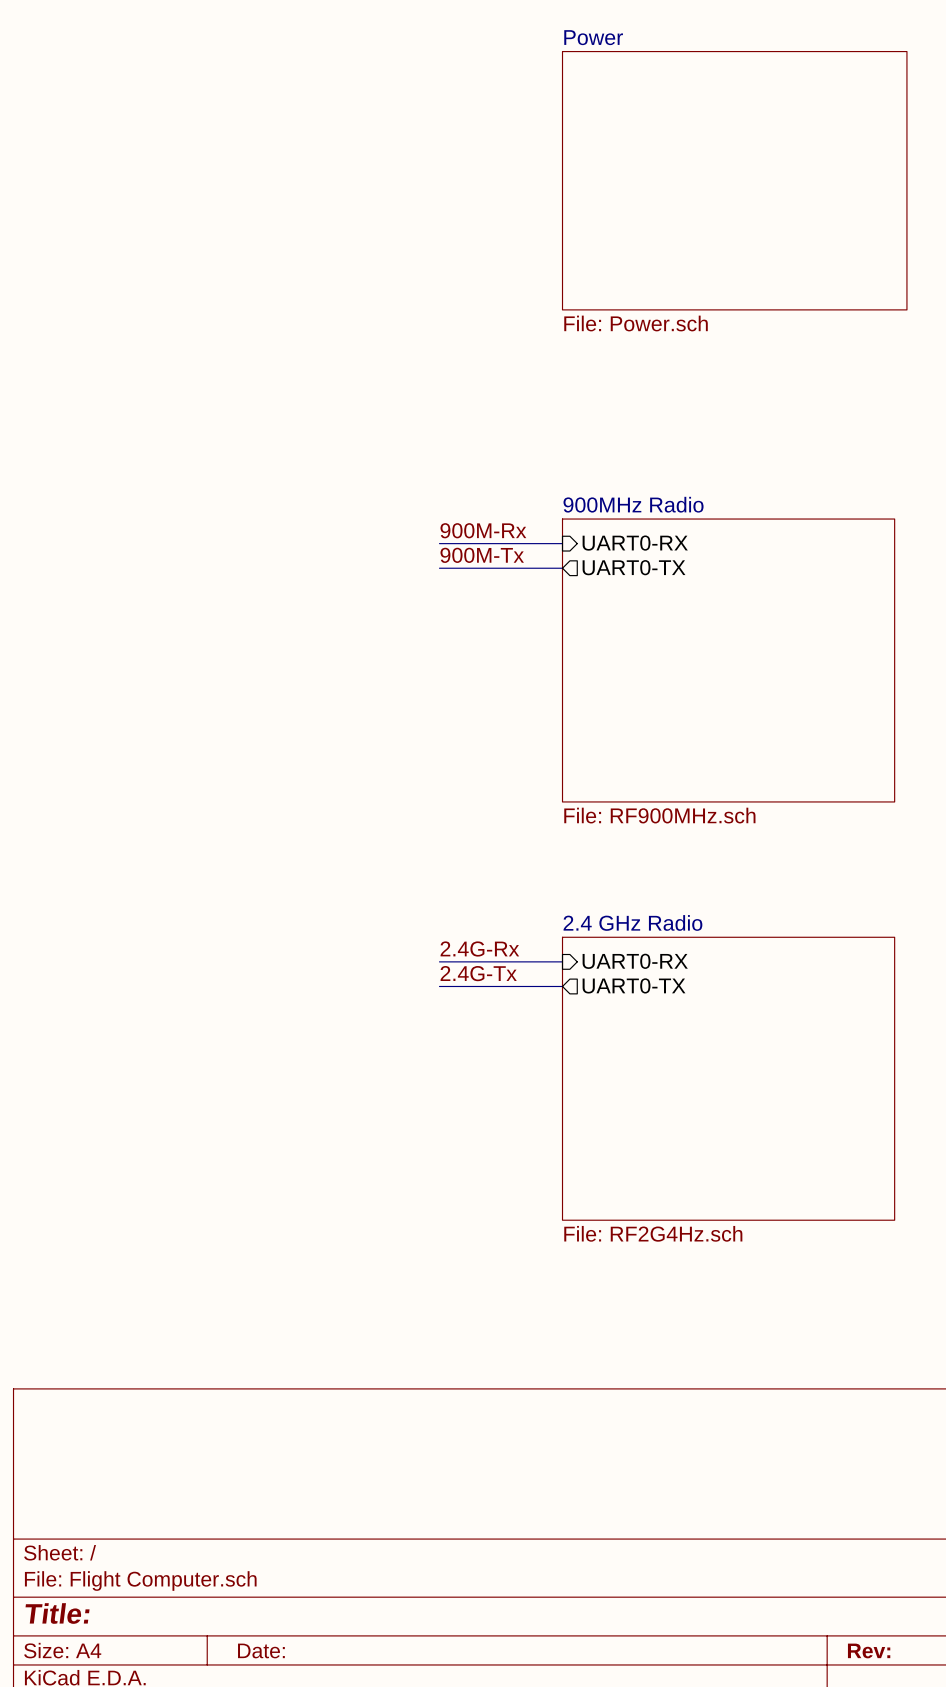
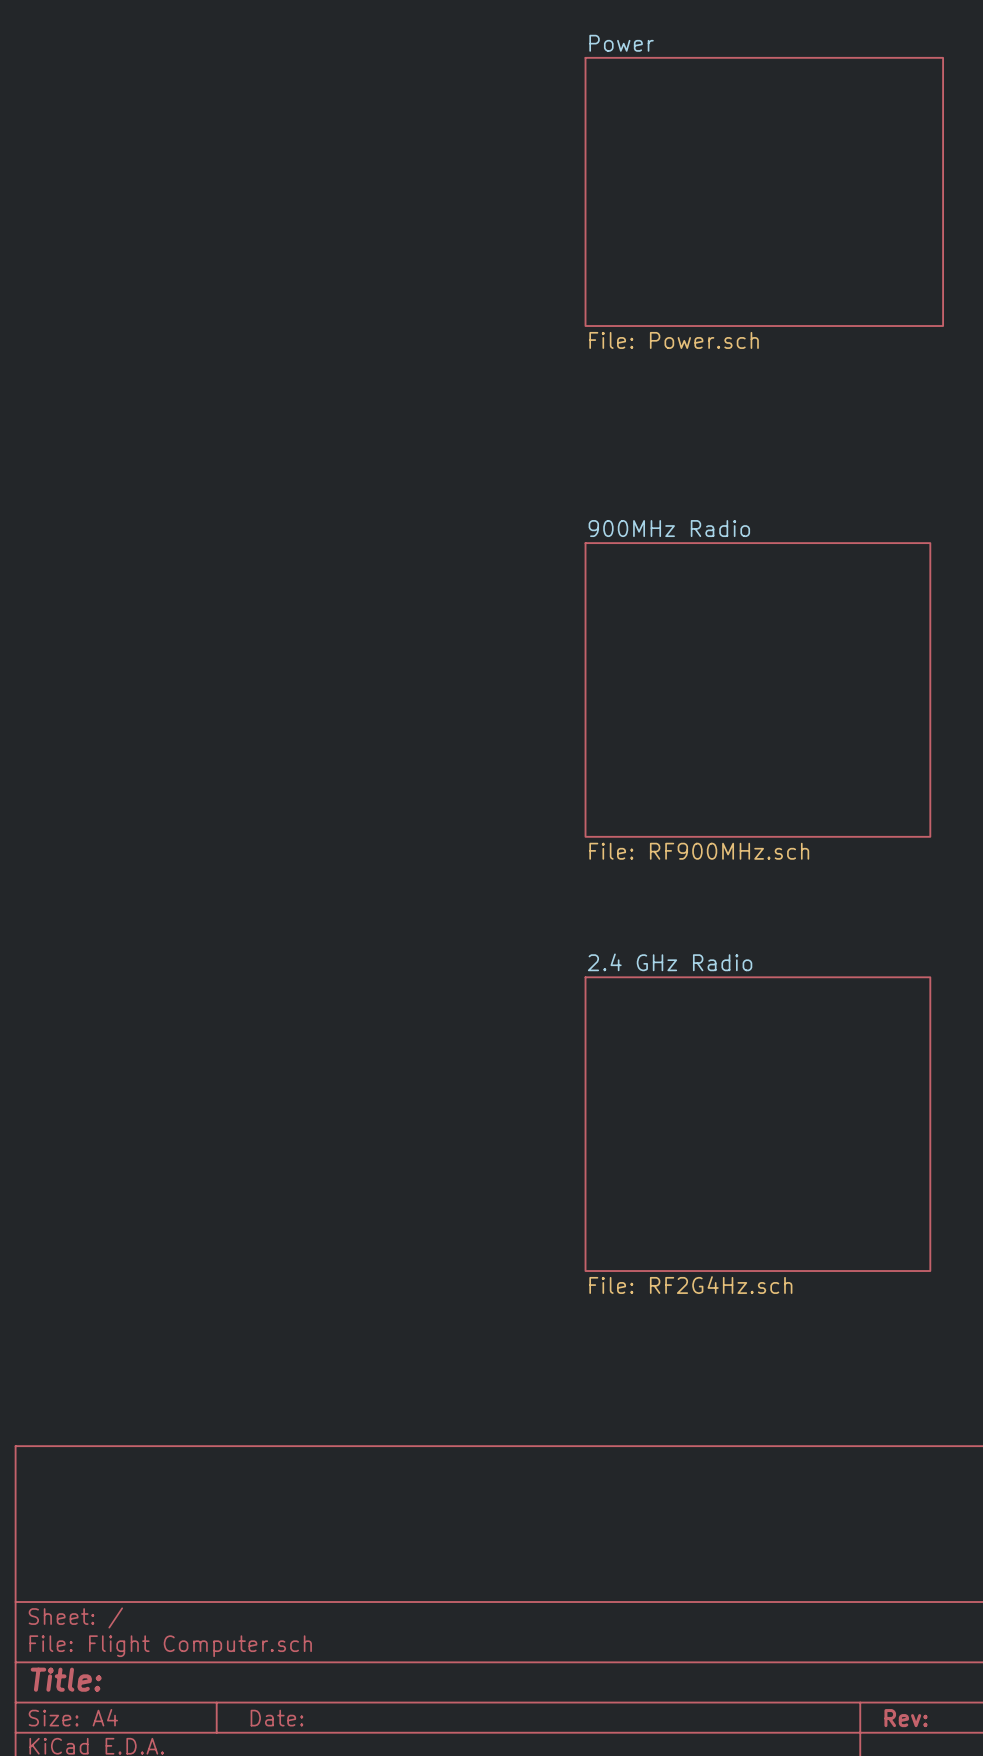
label: 900M-Rx (483, 530) -> none
wire: (439, 543) (562, 543) -> none
sheet pin: UART0-RX (635, 543) -> none
label: 900M-Tx (482, 555) -> none
sheet pin: UART0-TX (634, 567) -> none
wire: (439, 568) (562, 568) -> none
label: 2.4G-Rx (479, 949) -> none
wire: (439, 961) (562, 961) -> none
sheet pin: UART0-RX (635, 961) -> none
label: 2.4G-Tx (478, 973) -> none
sheet pin: UART0-TX (634, 985) -> none
wire: (439, 986) (562, 986) -> none

